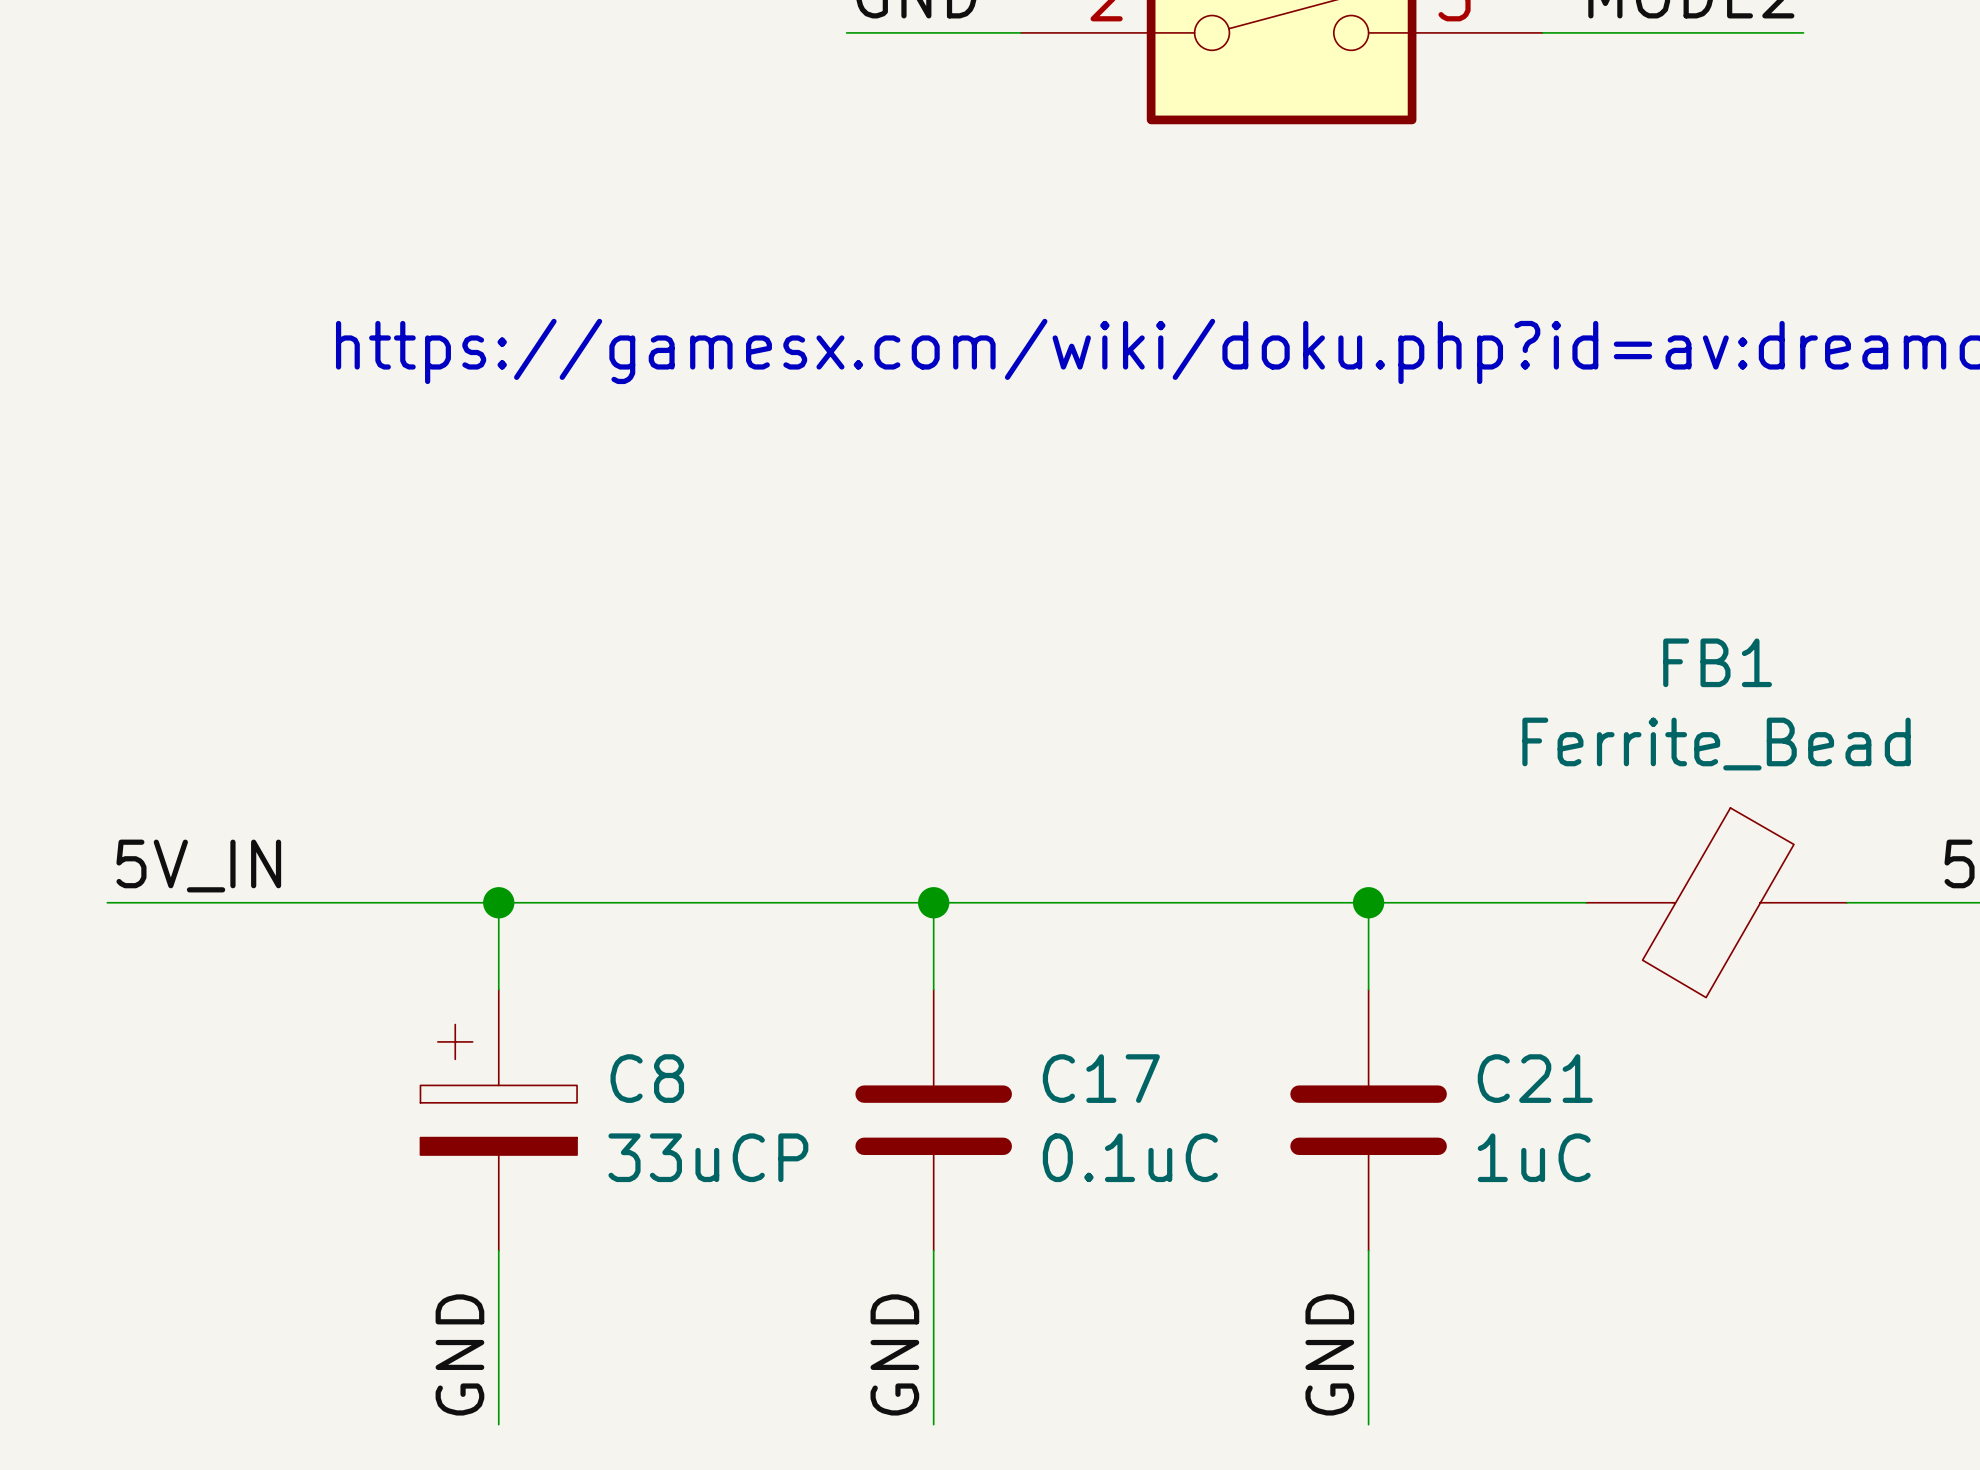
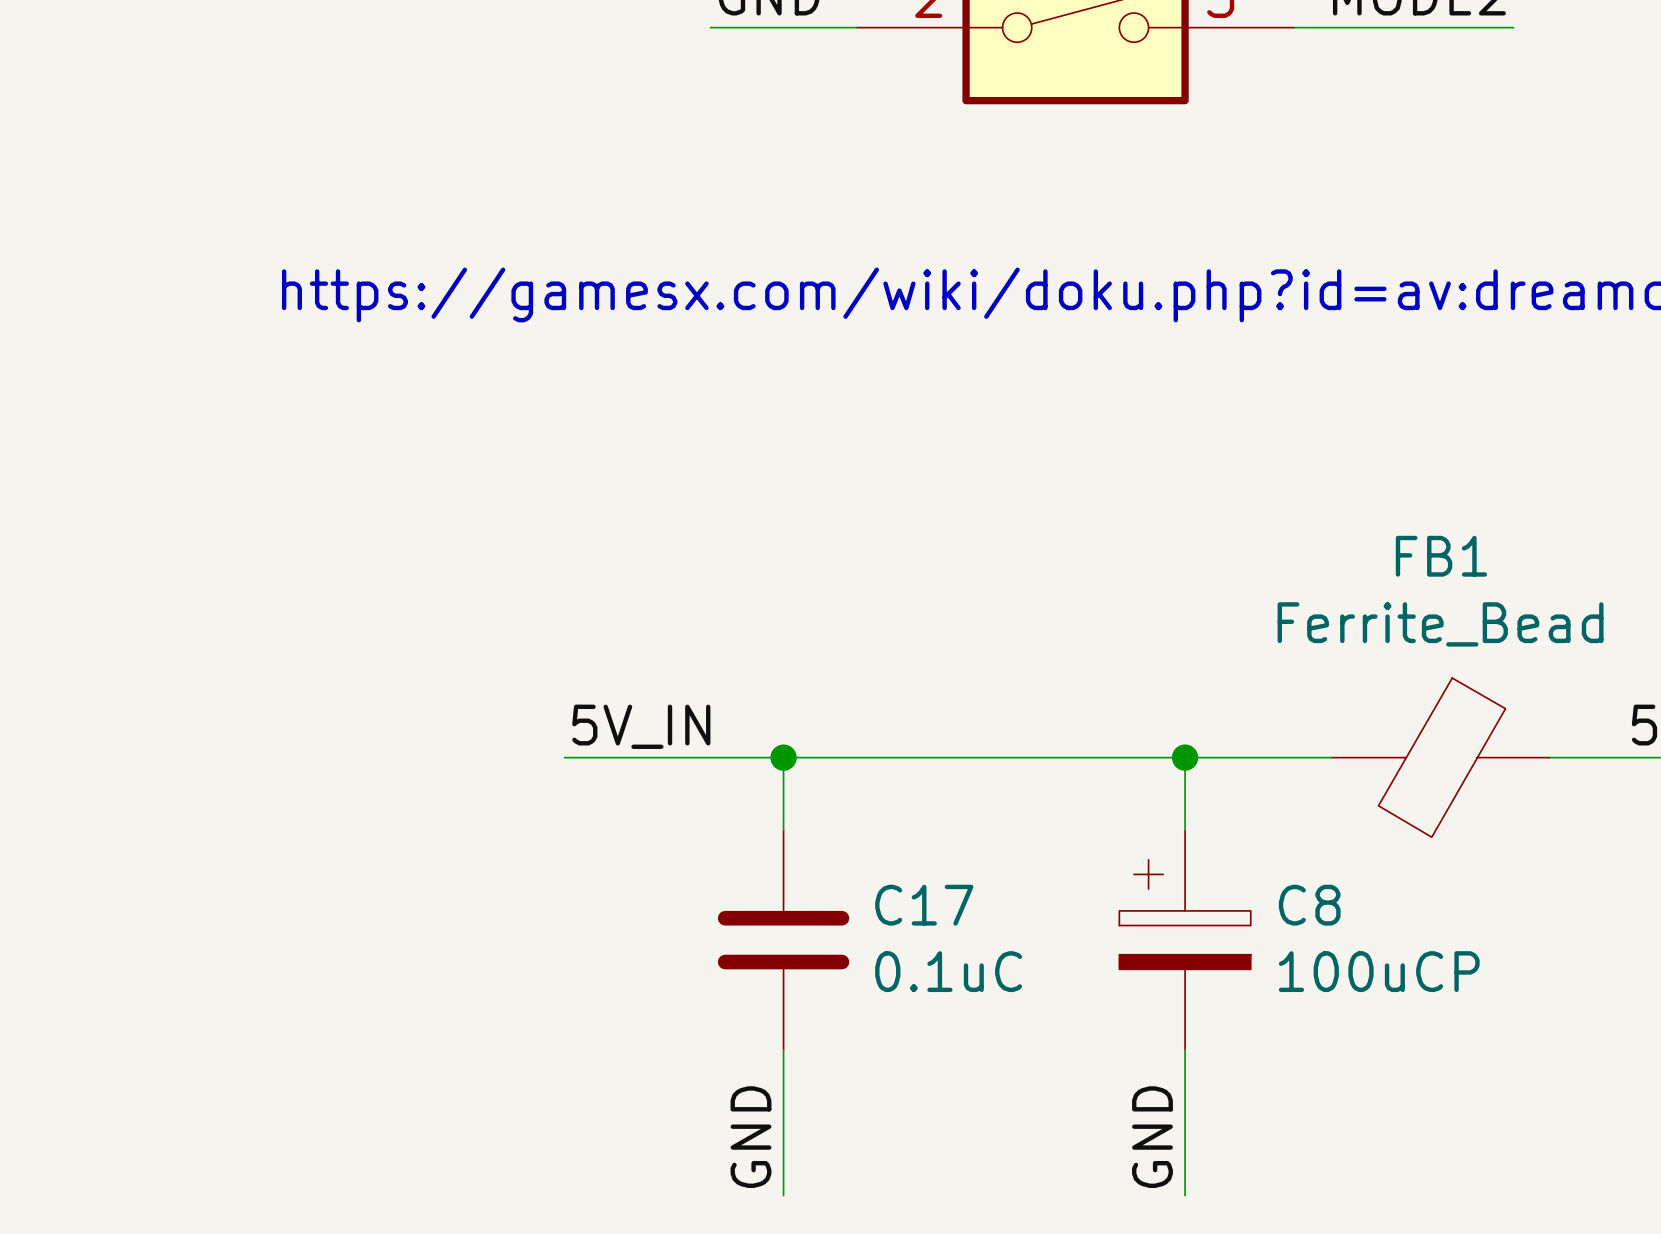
label position: 5V_IN (198, 866) -> 5V_IN (641, 726)
wire: (107, 902) (672, 902) -> none
wire: (498, 902) (498, 989) -> none
junction: (498, 902) -> none
wire: (1368, 902) (1368, 989) -> (1185, 757) (1185, 830)
junction position: (1368, 902) -> (1185, 757)
C8 position: (498, 1120) -> (1185, 940)
C21: 1uC (1368, 1120) -> none
C8 value: 33uCP (708, 1157) -> 100uCP (1379, 971)
wire: (498, 1250) (498, 1424) -> none
wire: (1368, 1250) (1368, 1424) -> (1185, 1049) (1185, 1195)
label: GND (459, 1354) -> none
label position: GND (1329, 1354) -> GND (1152, 1137)

